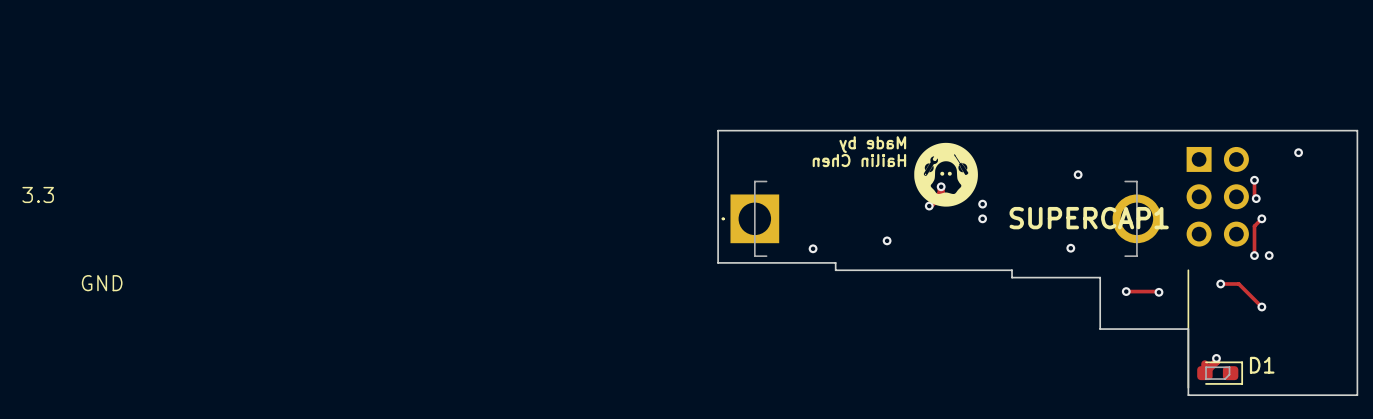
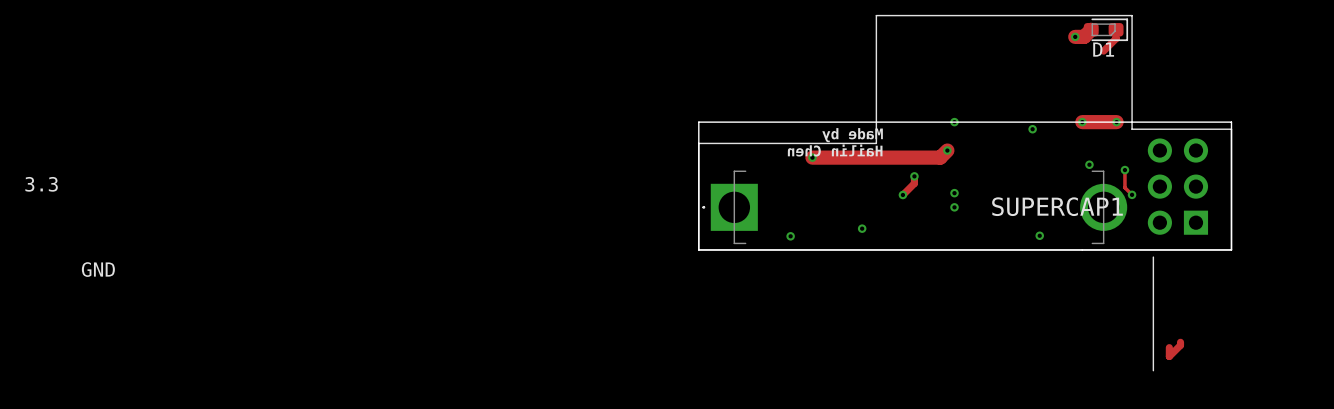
line: none -> (876, 15) (876, 143) (698, 143) (698, 249) (1231, 249) (1231, 129) (1132, 129) (1132, 15) (876, 15)
track: none -> (1091, 29) (1084, 36) (1075, 36)
track: none -> (1116, 29) (1116, 38) (1103, 51)
via: none -> (1075, 36)
via: none -> (954, 122)
track: none -> (1082, 122) (1116, 122)
via: none -> (1082, 122)
via: none -> (1116, 122)
board edge: (1269, 130) (1357, 130) (1357, 395) (1188, 395) (1188, 329) (1100, 329) (1100, 277) (1012, 277) (1012, 270) (835, 270) (835, 262) -> (1231, 122) (1231, 249) (812, 249)
via: none -> (1032, 129)
drawing: [914, 142, 978, 207] -> none
via: (1298, 152) -> none
track: none -> (947, 150) (940, 157) (812, 157)
via: none -> (947, 150)
via: none -> (812, 157)
via: (1078, 174) -> none
via: none -> (1089, 164)
track: none -> (1124, 170) (1124, 187) (1132, 194)
via: none -> (1124, 170)
track: (1254, 180) (1254, 196) (1256, 198) -> none
via: (1254, 180) -> none
part rotation: 0° (1217, 196) -> 180° (1177, 186)
via: (1256, 198) -> none
via: none -> (1132, 194)
track: (1261, 218) (1254, 226) (1254, 255) -> none
via: (1261, 218) -> none
via: (1254, 255) -> none
via: (1269, 255) -> none
track: (1220, 283) (1238, 283) (1261, 307) -> none
via: (1220, 283) -> none
track: (1126, 291) (1158, 292) -> none
via: (1126, 291) -> none
via: (1158, 292) -> none
via: (1261, 307) -> none
via: (1216, 358) -> none
D1 name position: D1 (1262, 365) -> D1 (1103, 49)
D1 position: (1220, 373) -> (1105, 29)

